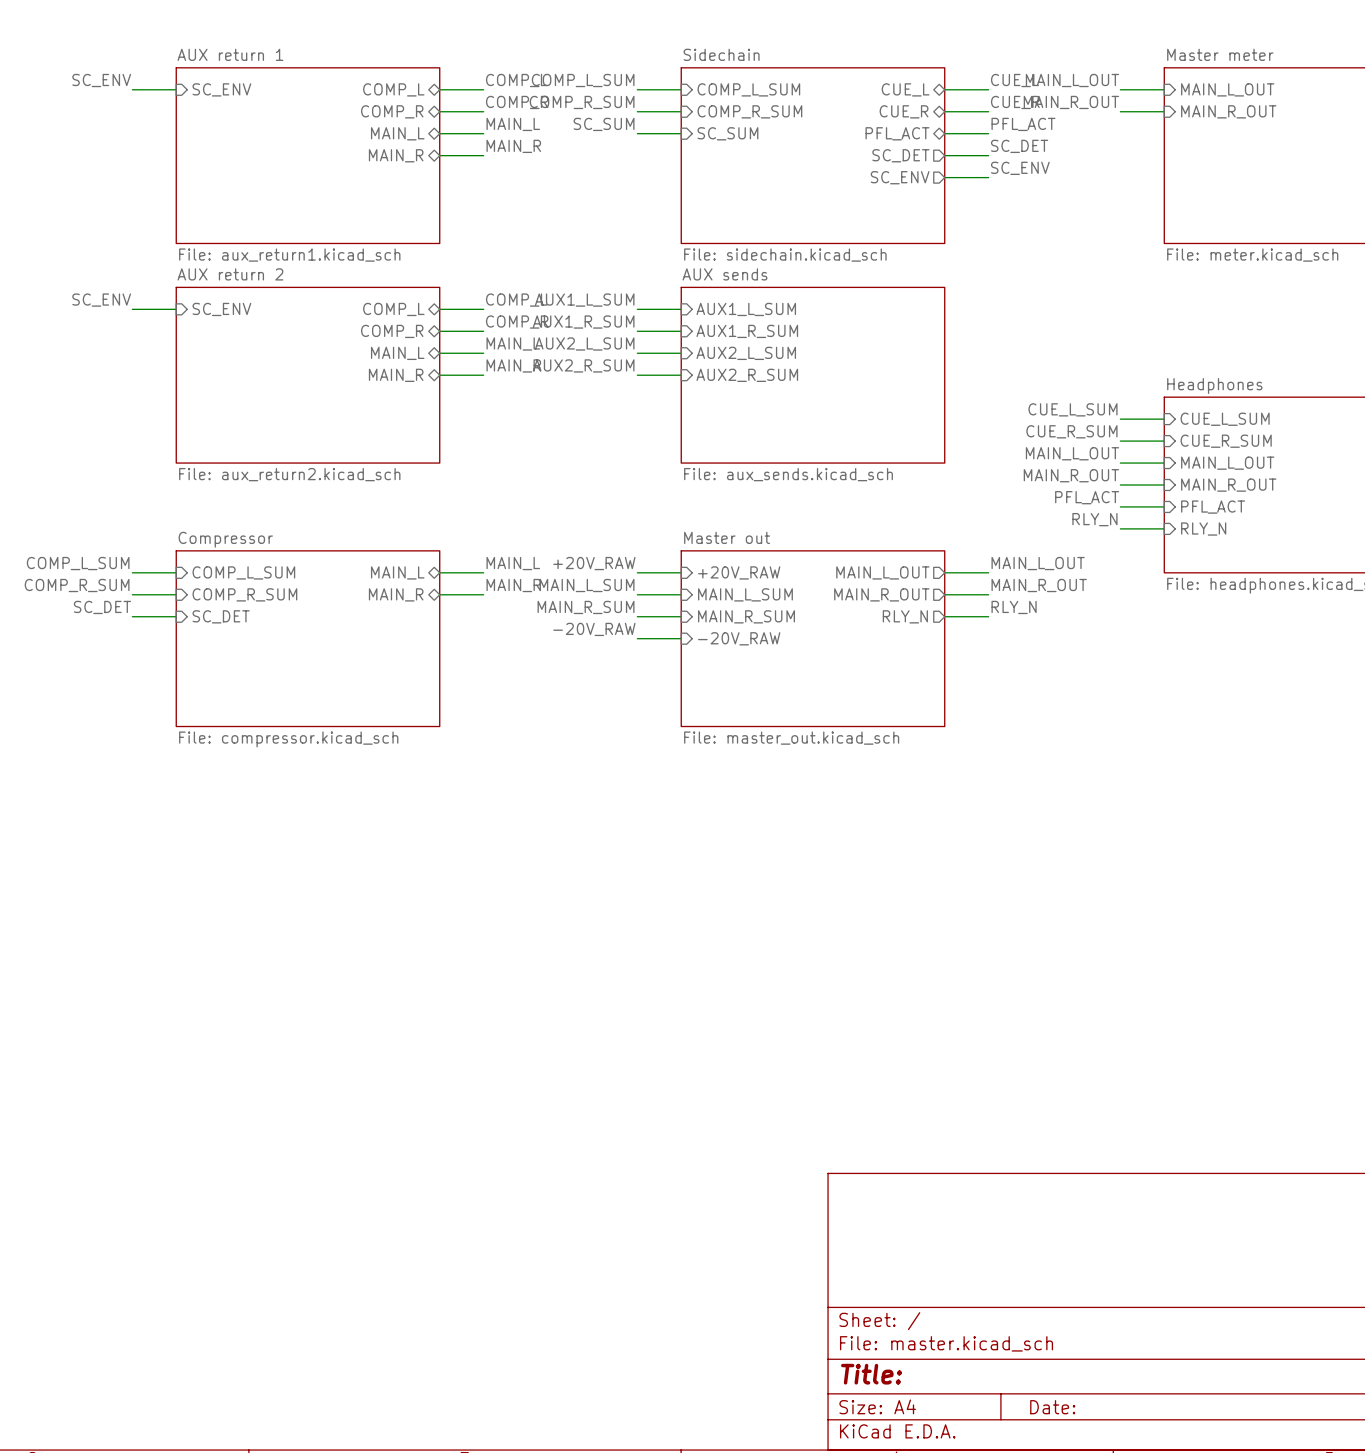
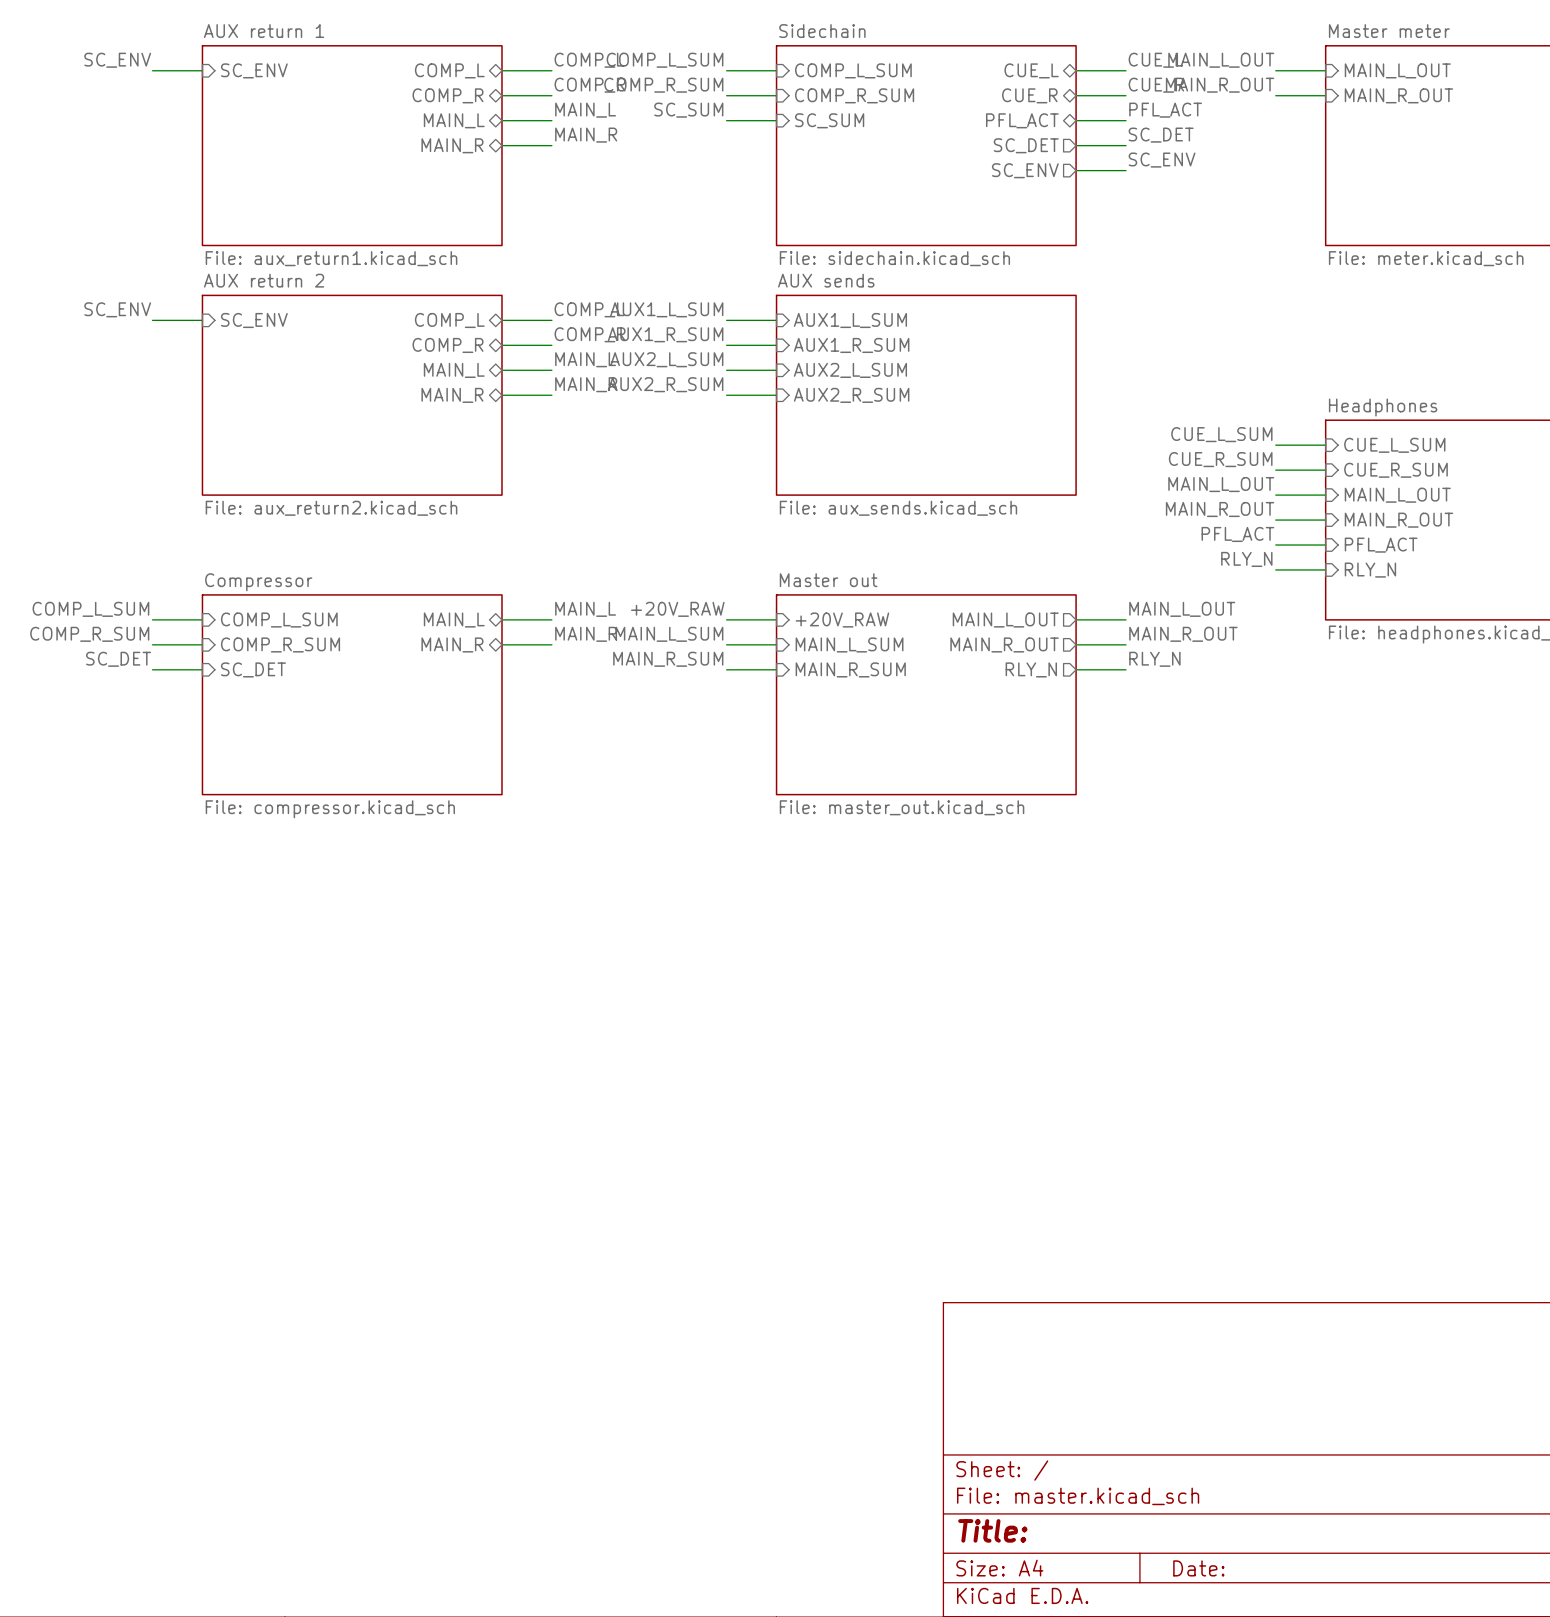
label: -20V_RAW (594, 629) -> none
wire: (637, 638) (681, 638) -> none
sheet pin: -20V_RAW (739, 638) -> none

